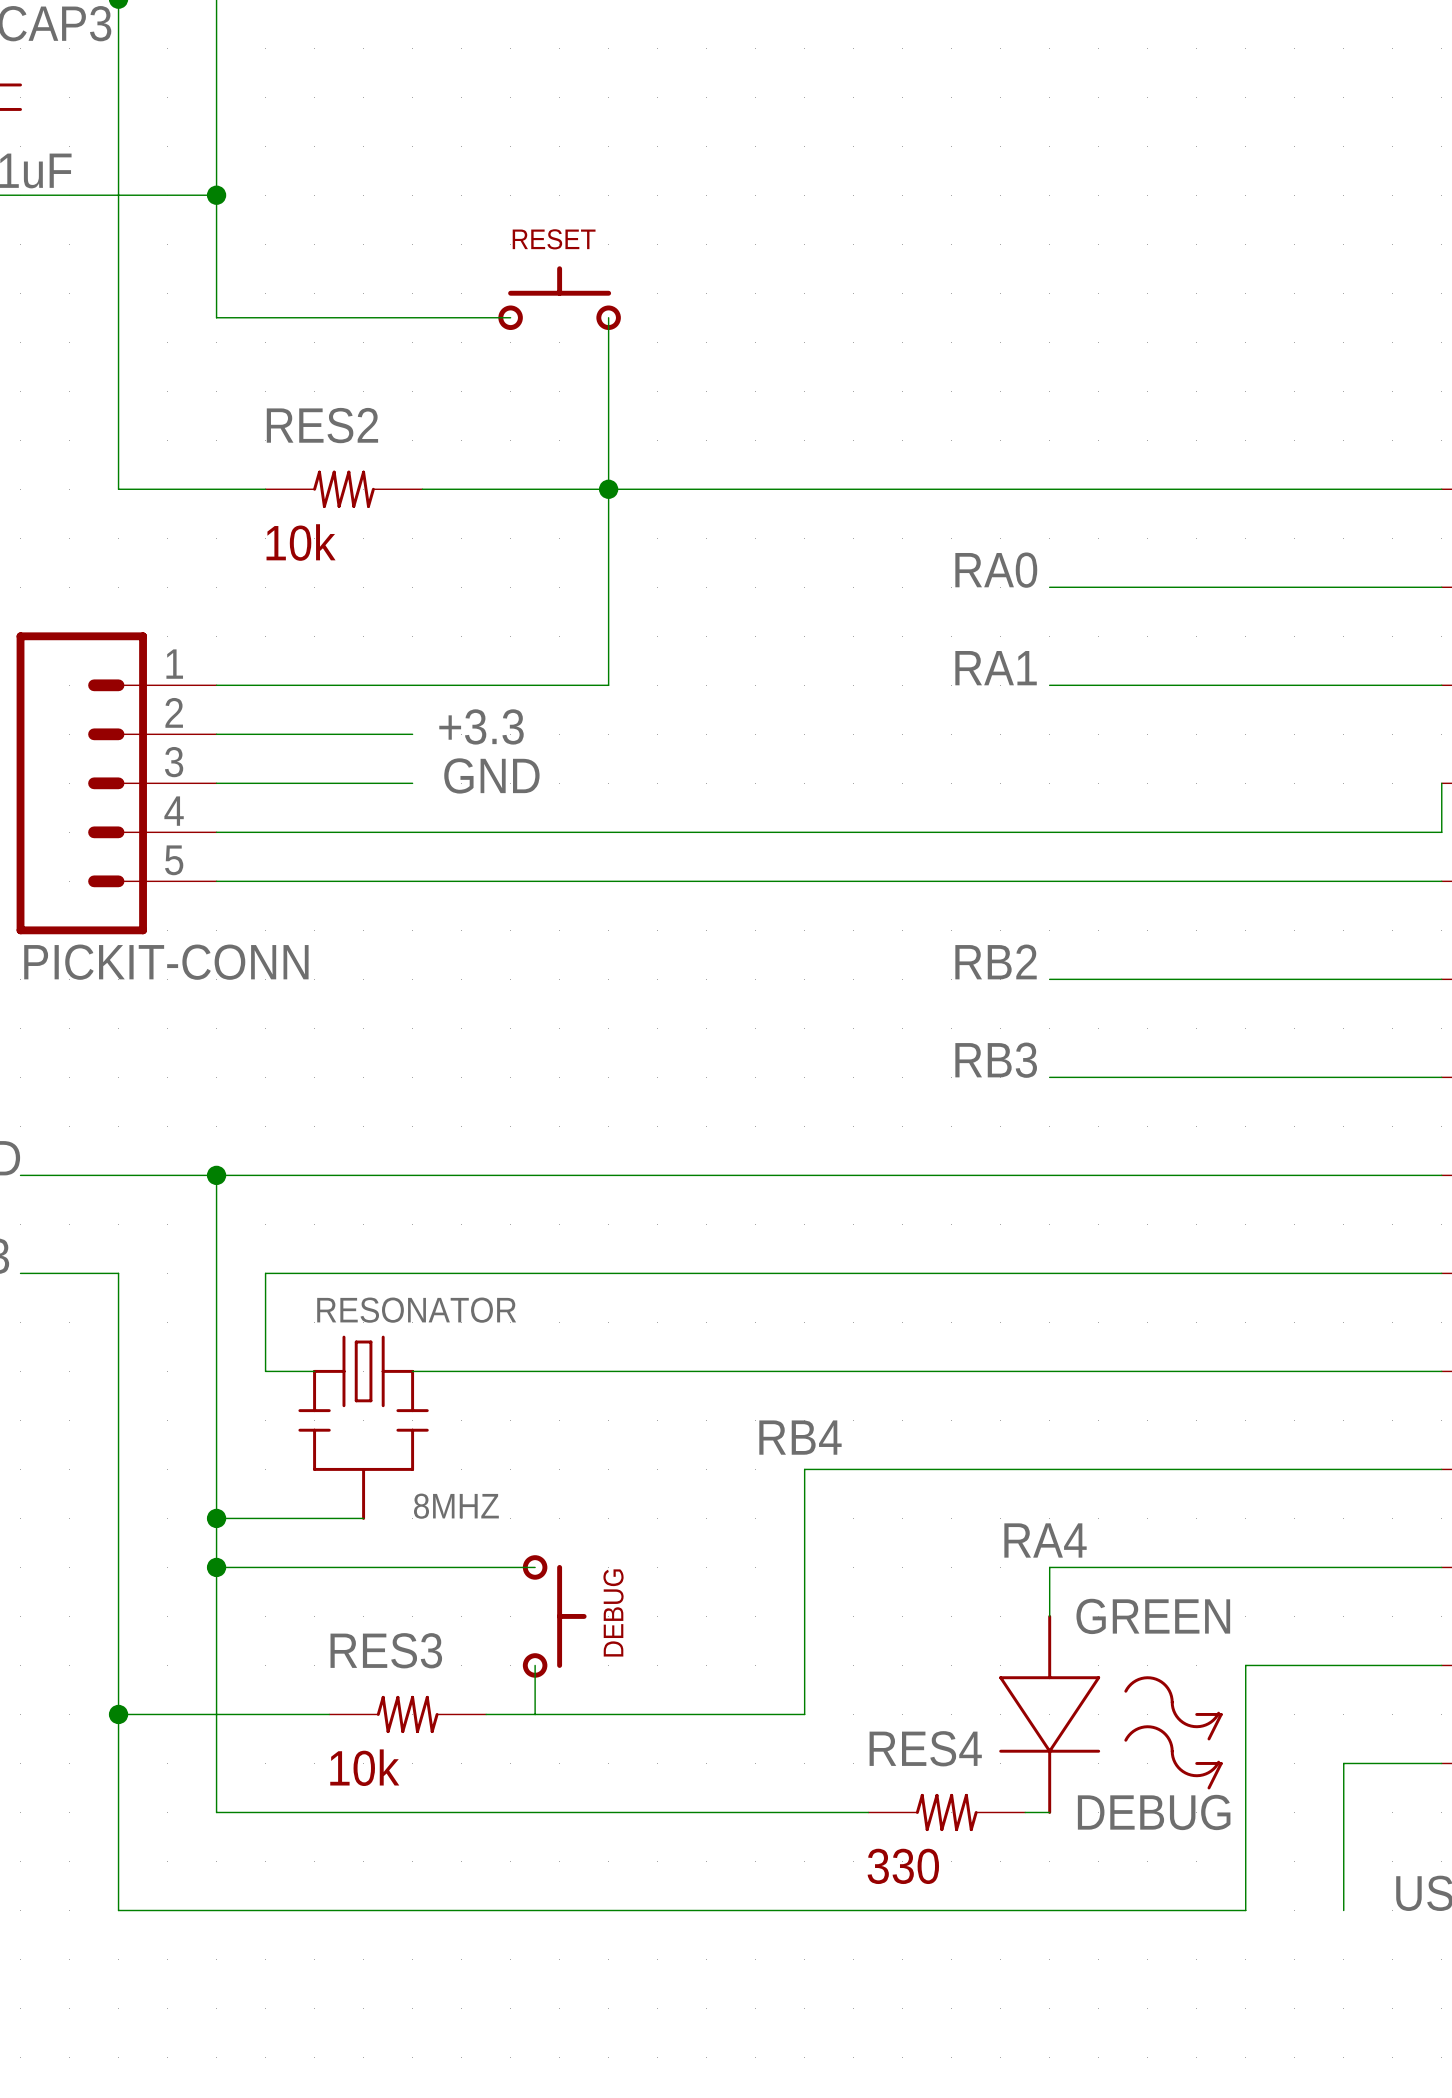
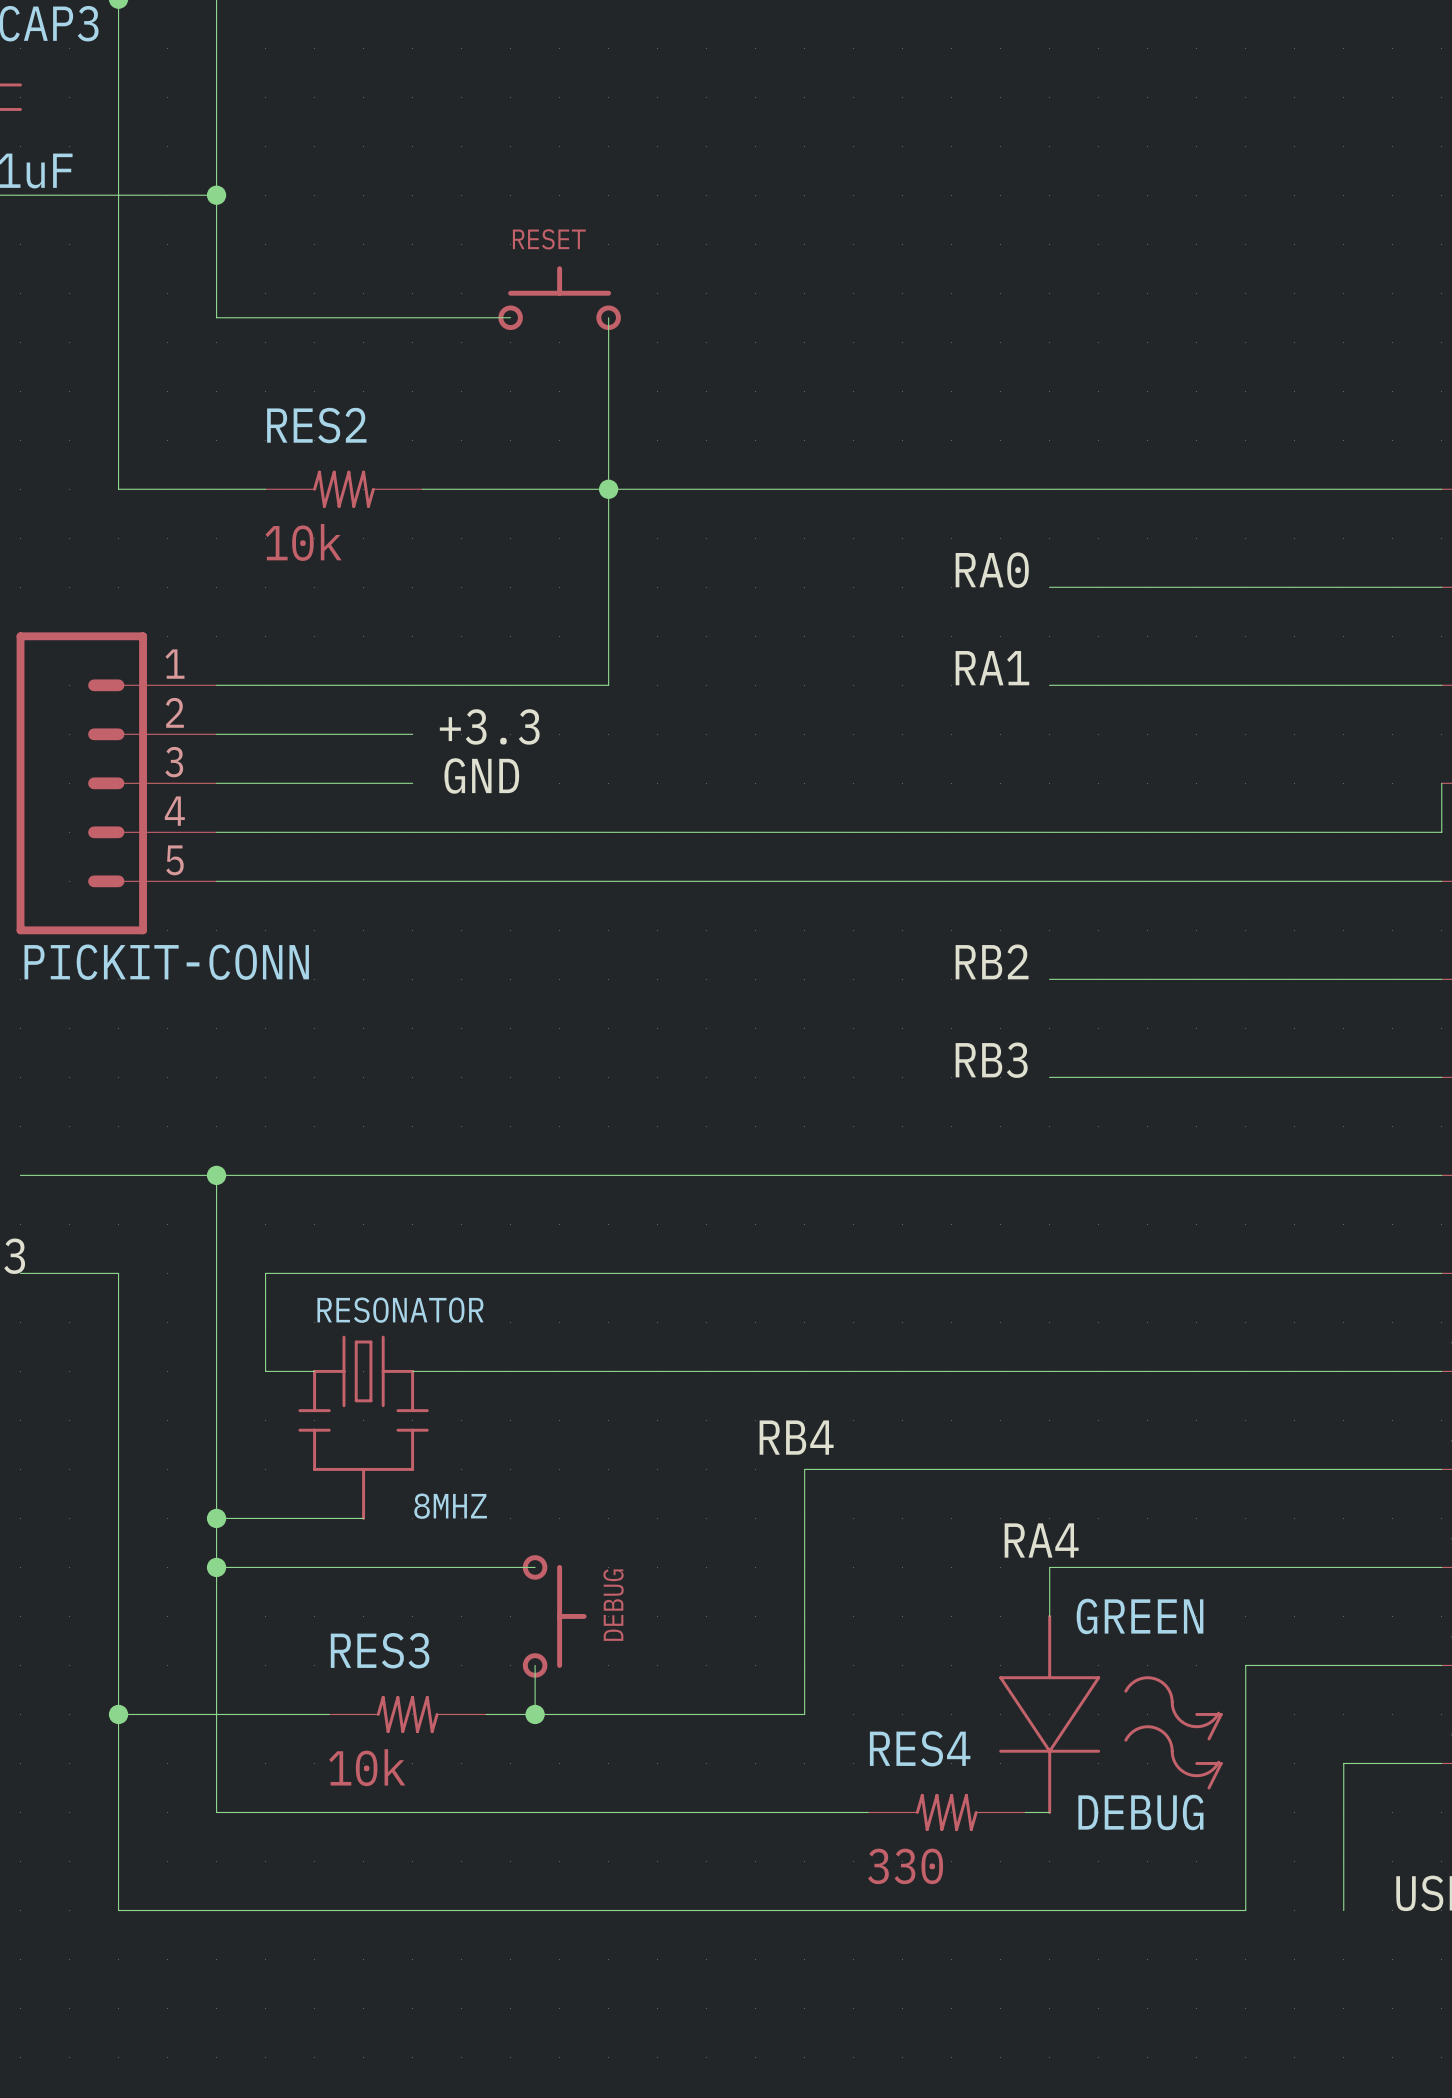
junction: none -> (535, 1714)

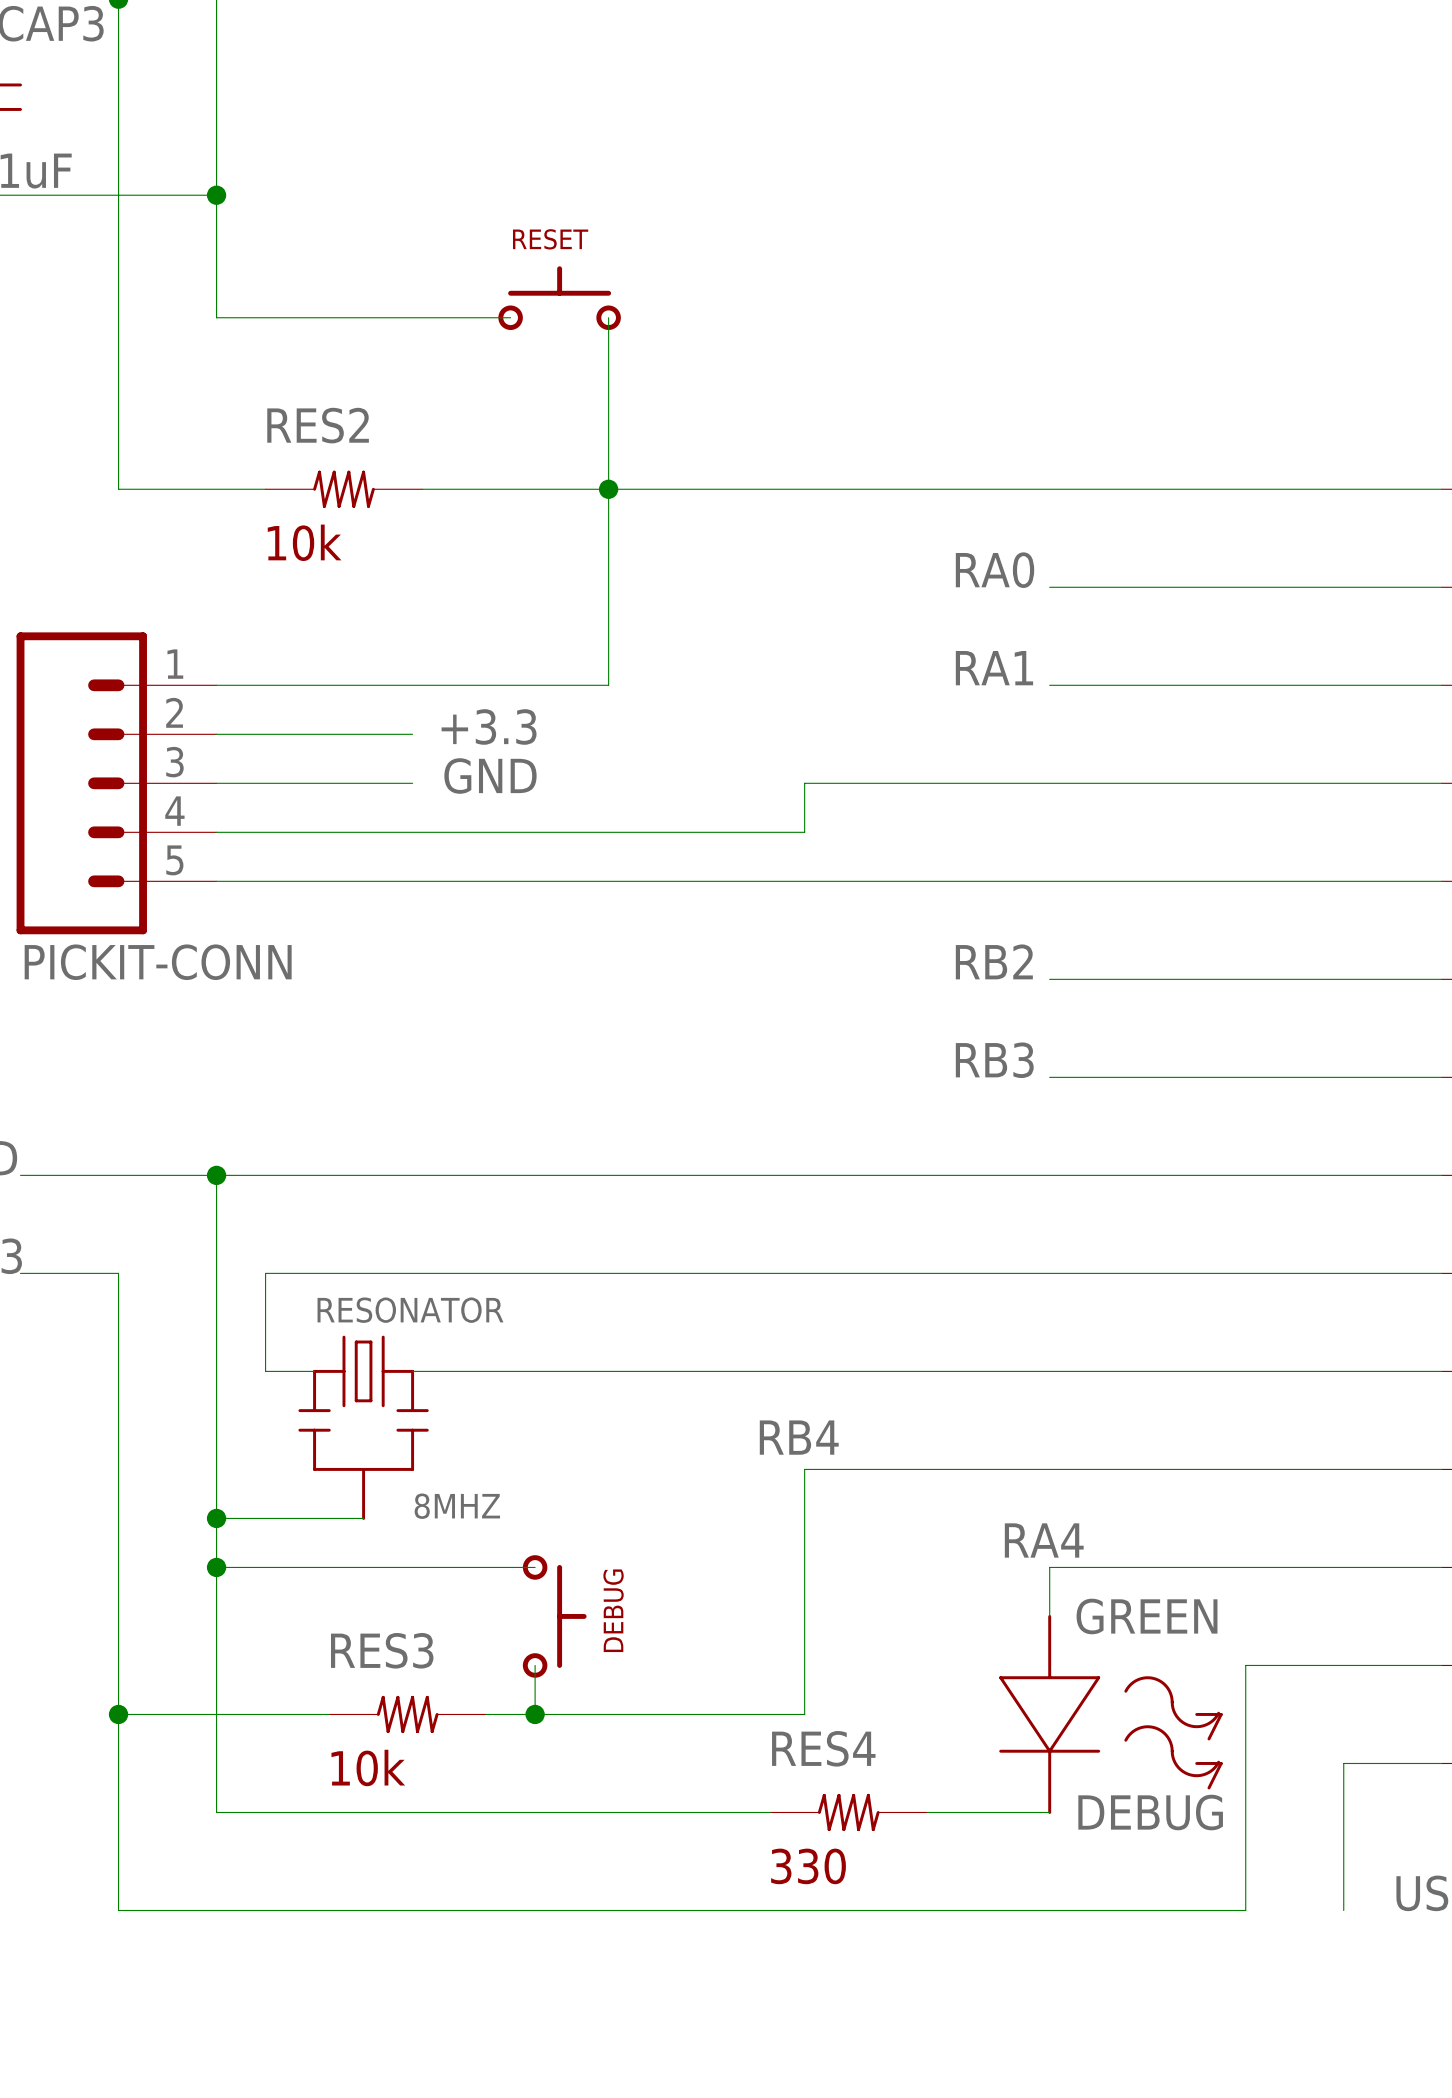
wire: (1441, 783) (1441, 832) (804, 832) -> (1441, 783) (804, 783) (804, 832)
RES4 position: (946, 1812) -> (848, 1812)

